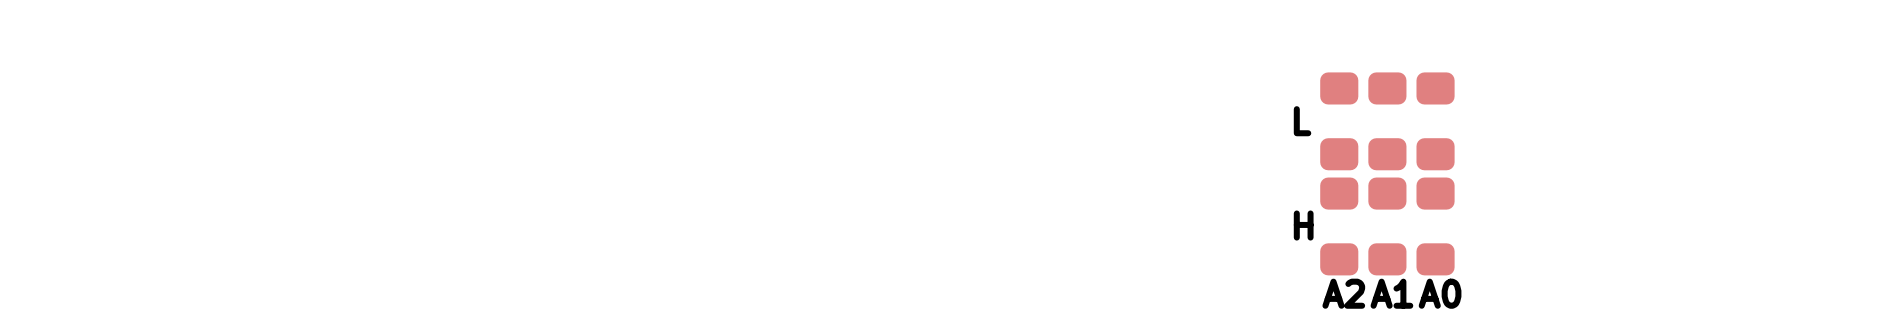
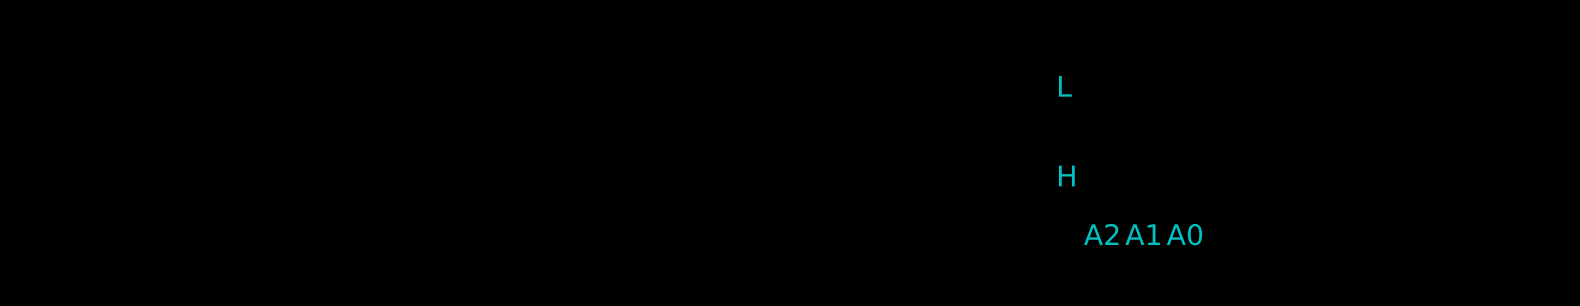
part: (1339, 121) -> none
part: (1387, 121) -> none
part: (1435, 121) -> none
part: (1339, 226) -> none
part: (1387, 226) -> none
part: (1435, 226) -> none

